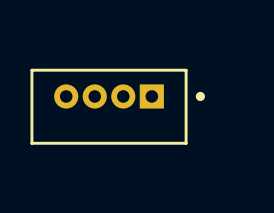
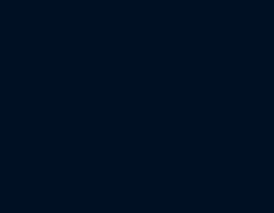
part: (117, 106) -> none

